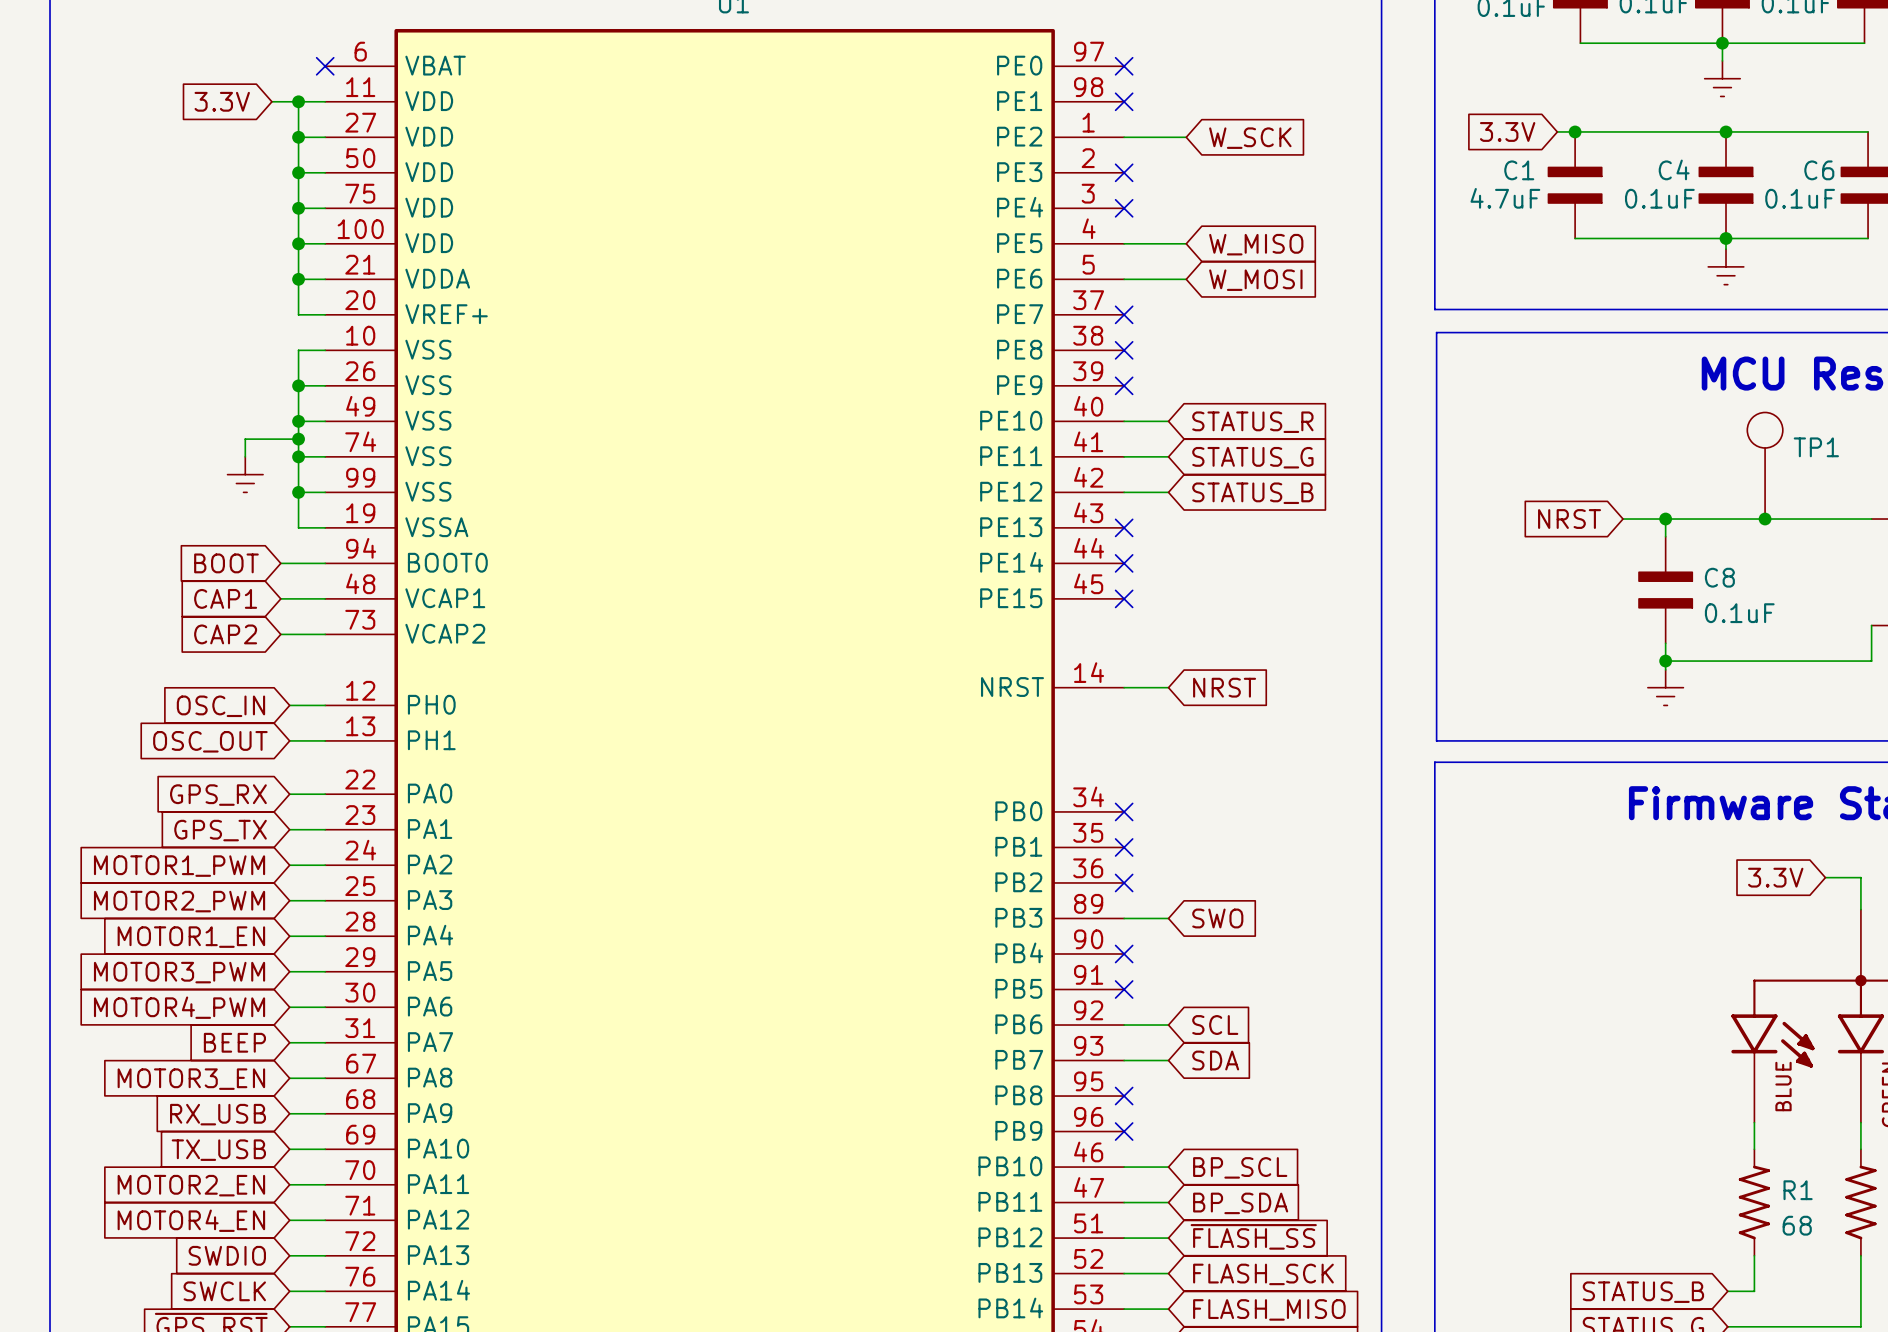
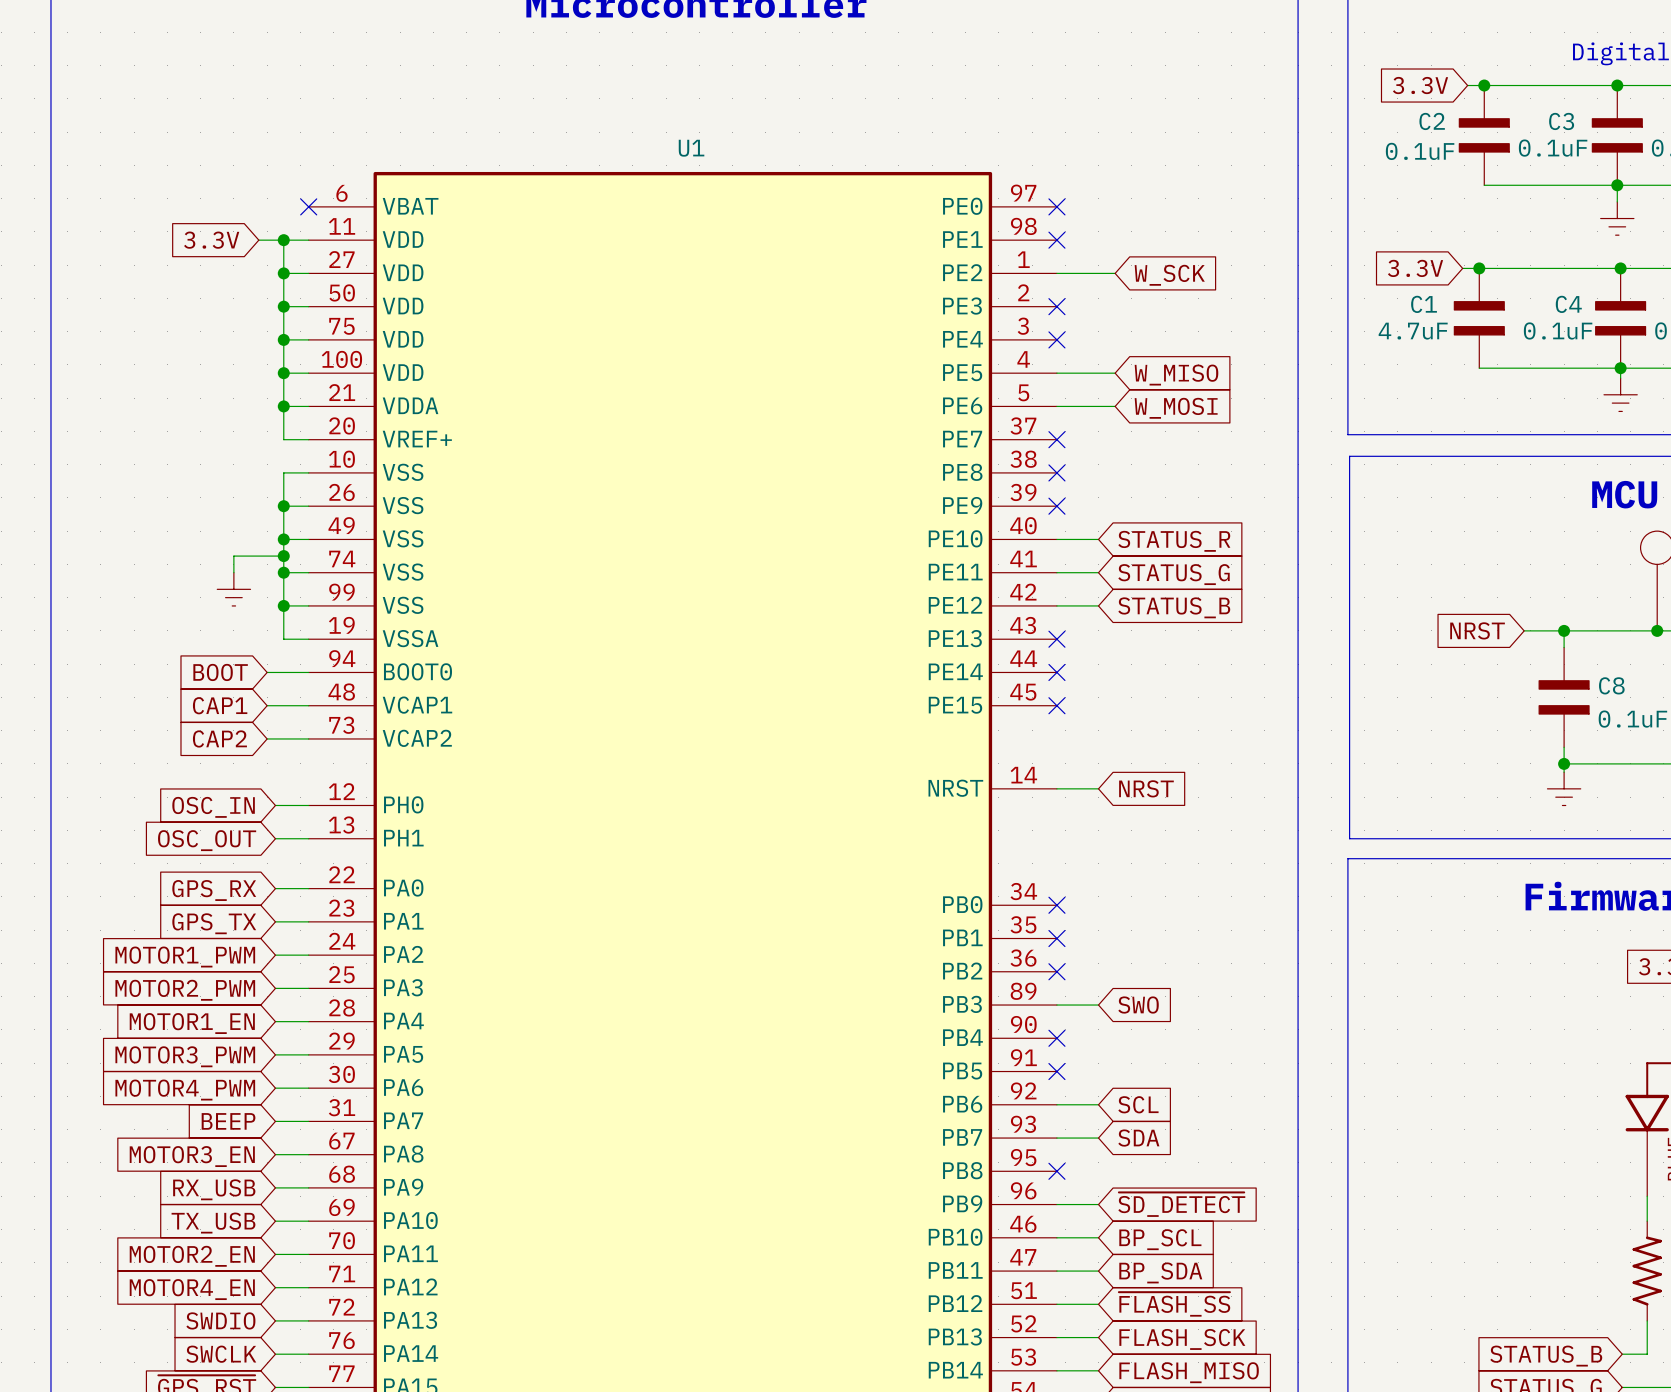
global label: none -> ~{SD_DETECT} (1181, 1204)
wire: none -> (1056, 1204) (1098, 1204)
no-connect mark: (1124, 1131) -> none

